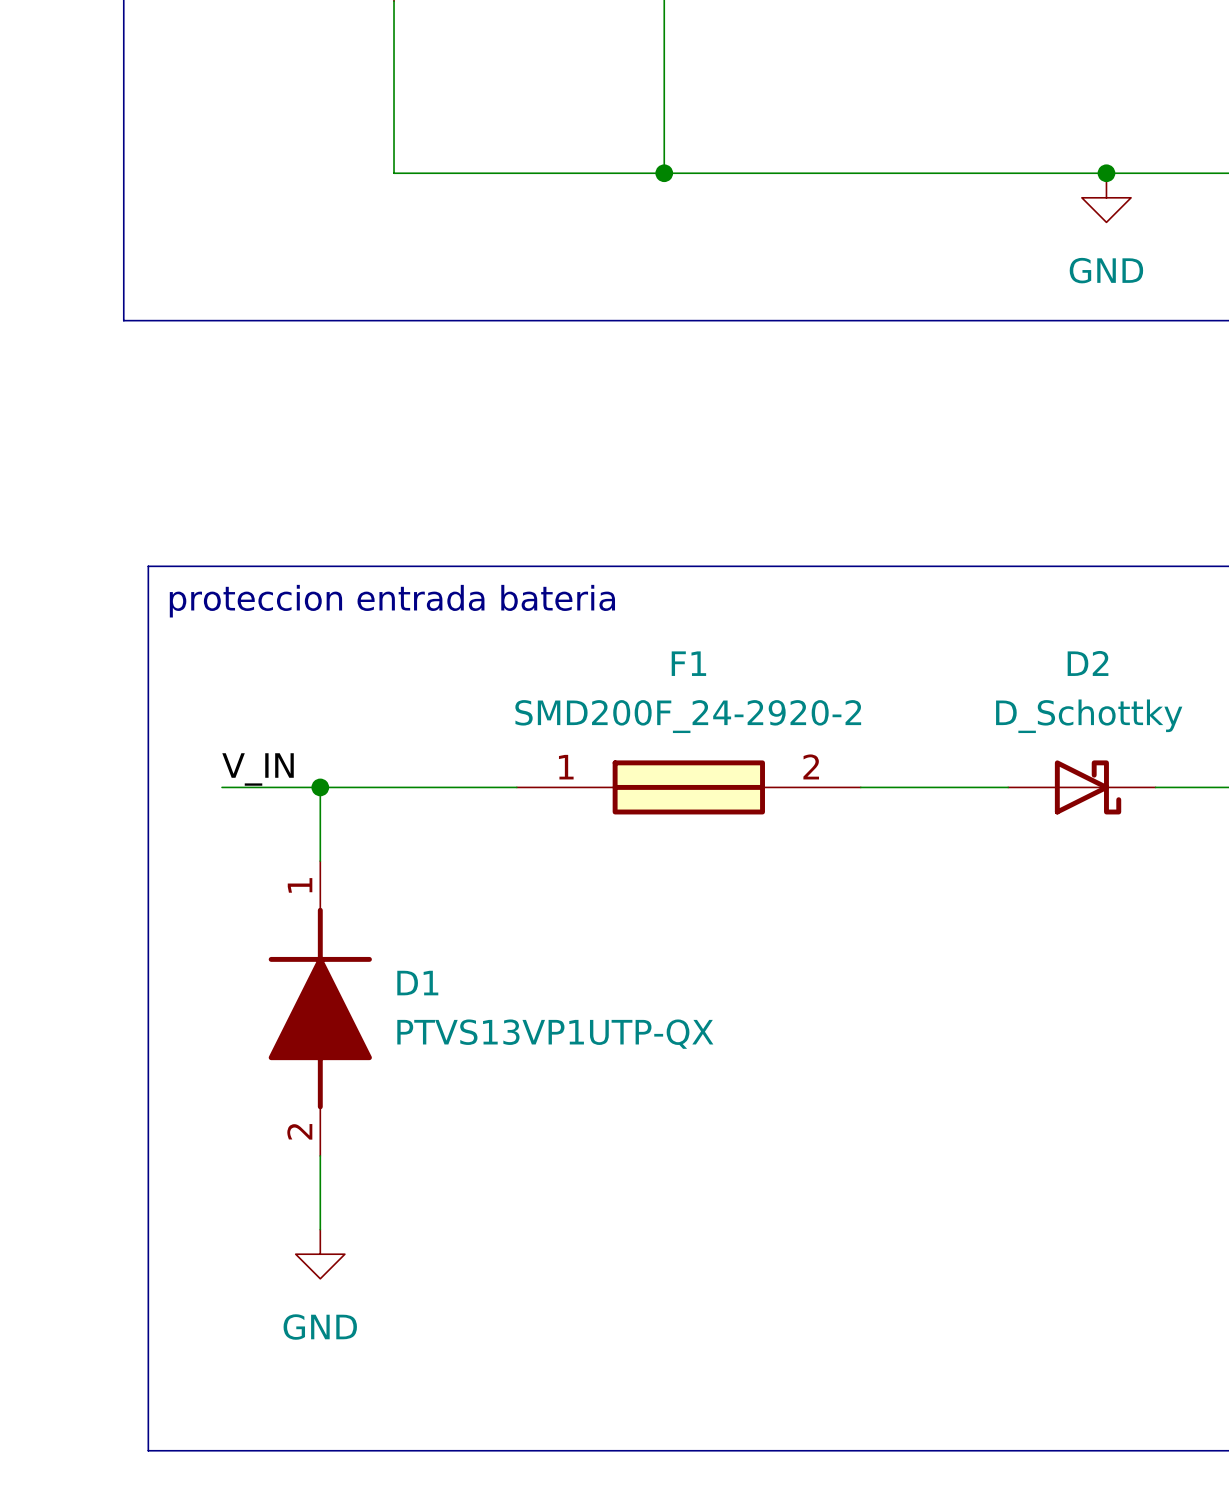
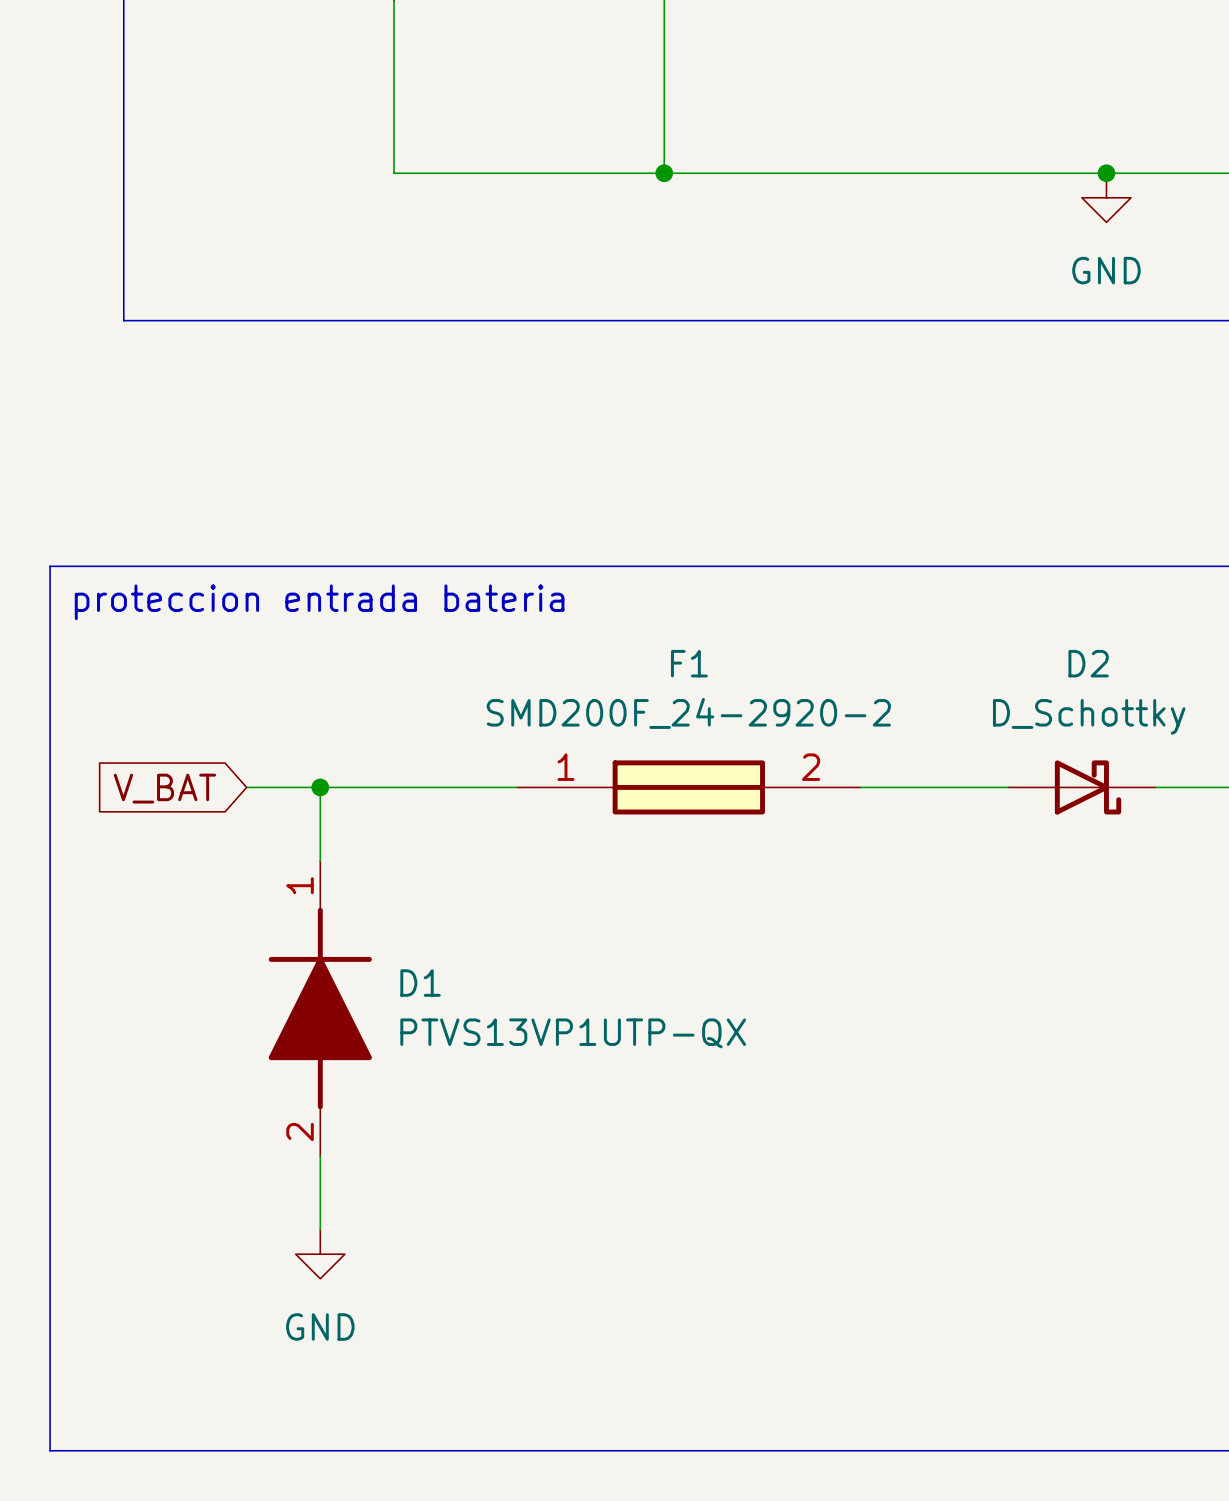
line: (148, 566) (148, 1450) -> (148, 566) (50, 566) (50, 1450) (148, 1450)
text position: proteccion entrada bateria (392, 601) -> proteccion entrada bateria (319, 602)
label: V_IN (258, 769) -> none
wire: (222, 787) (246, 787) -> none
global label: none -> V_BAT (164, 788)

